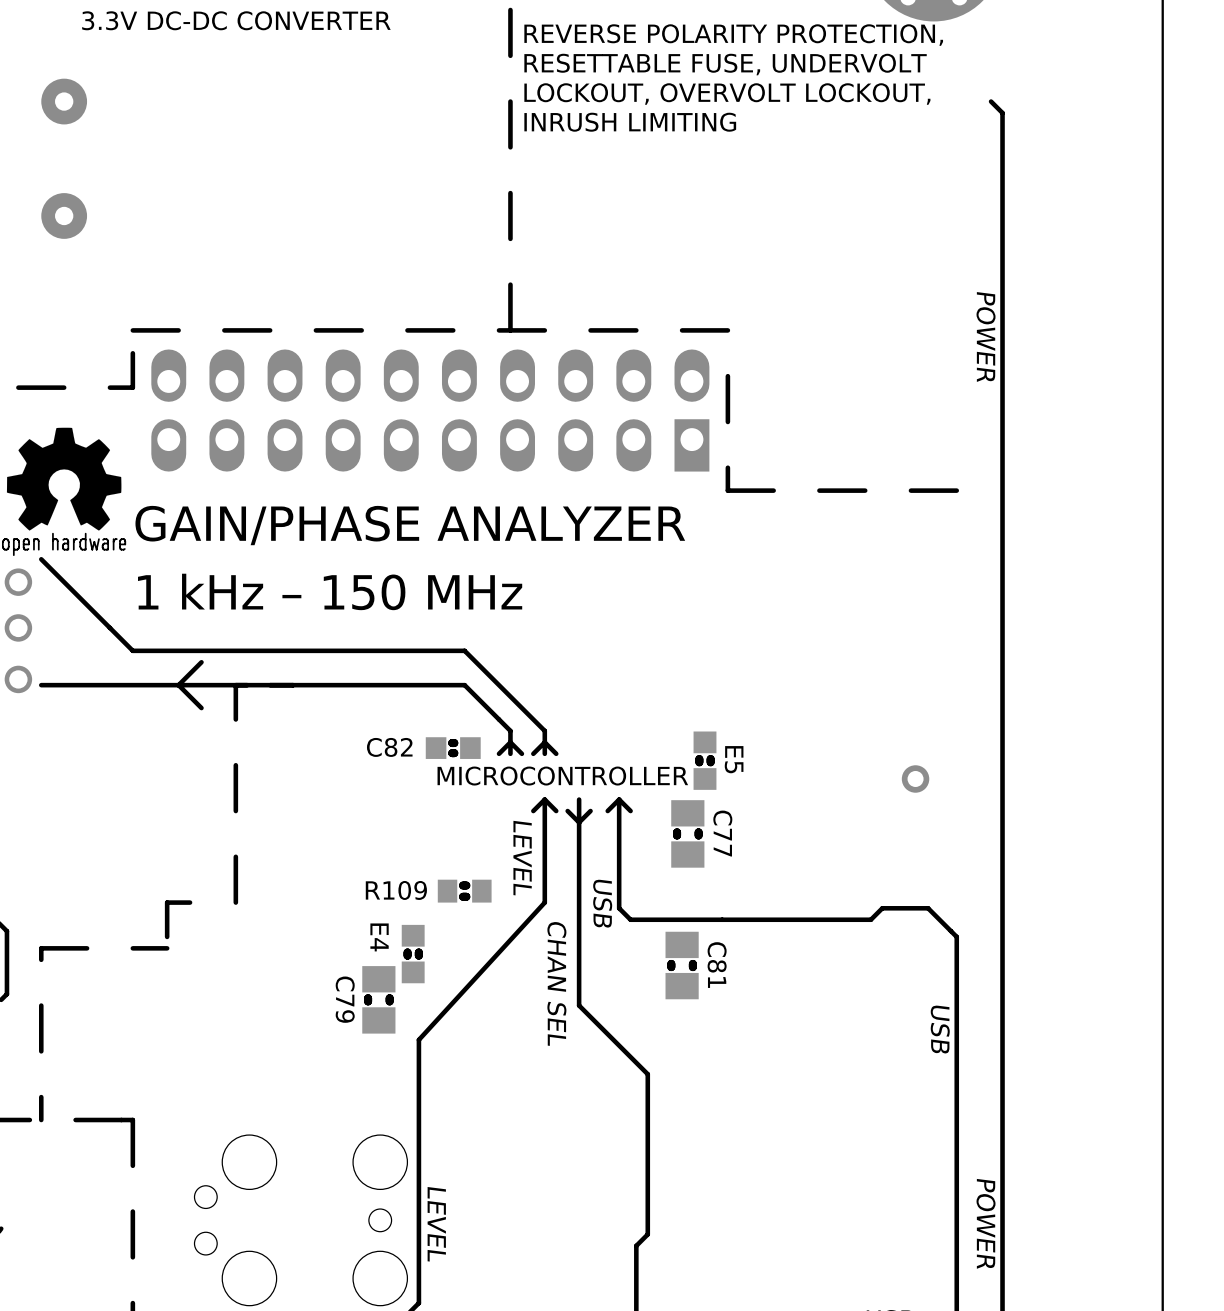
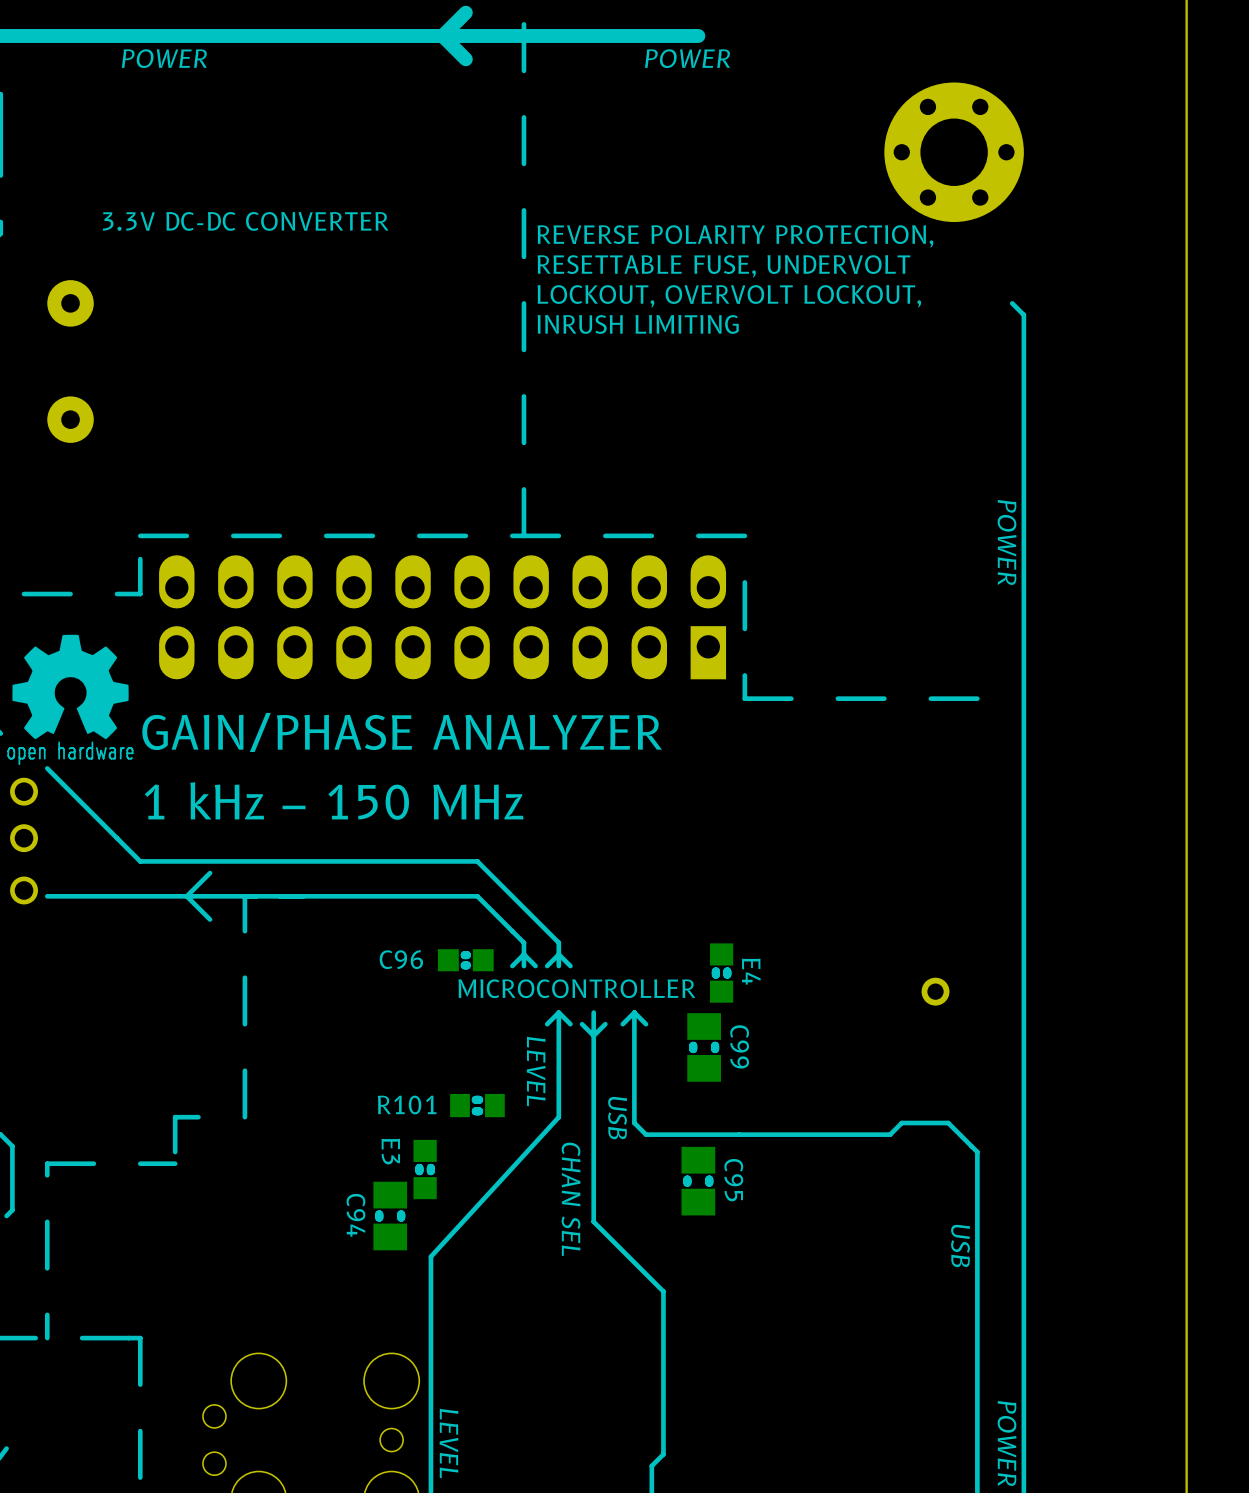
C82 name: C82 (389, 747) -> C96 (401, 959)
E5 name: E5 (734, 759) -> E4 (751, 971)
C77 name: C77 (722, 833) -> C99 (739, 1046)
R109 name: R109 (396, 890) -> R101 (407, 1104)
E4 name: E4 (379, 937) -> E3 (390, 1151)
C81 name: C81 (717, 965) -> C95 (733, 1180)
C79 name: C79 (345, 999) -> C94 (355, 1215)

